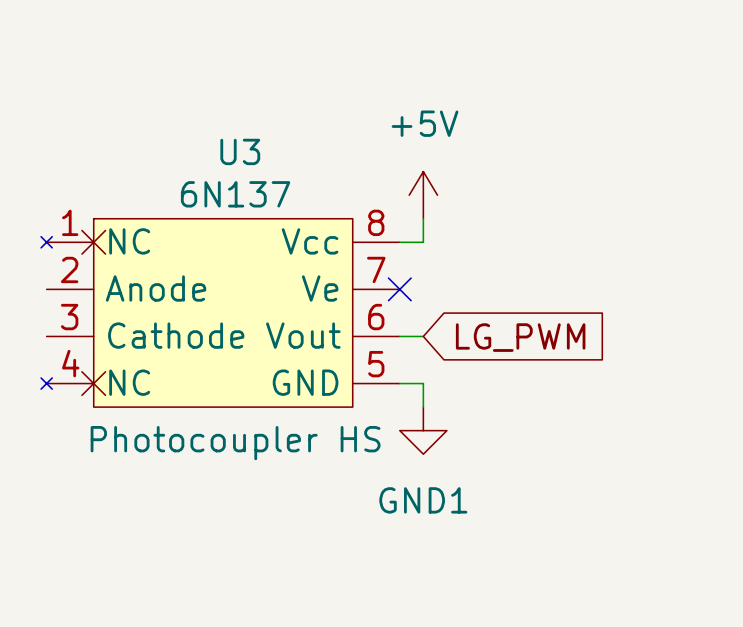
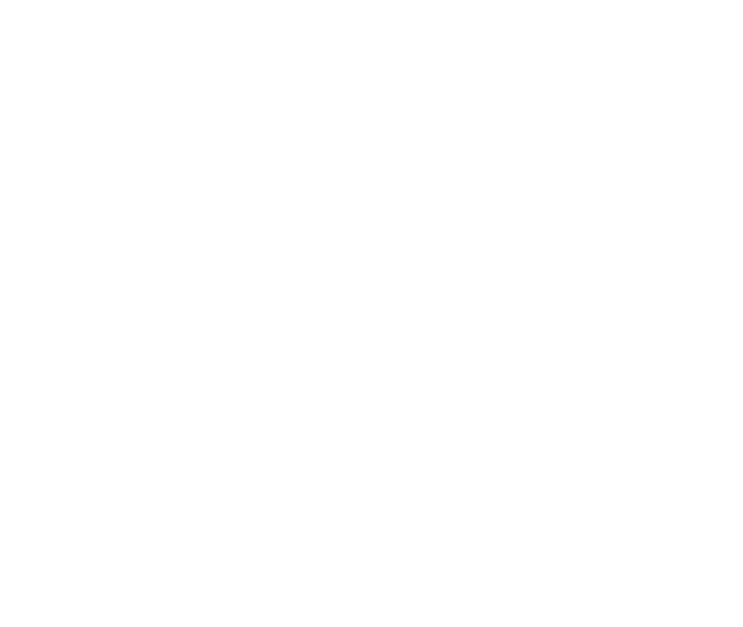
power symbol: +5V (423, 195) -> none
wire: (423, 218) (423, 242) (399, 242) -> none
no-connect mark: (399, 289) -> none
U3: 6N137 (220, 312) -> none
wire: (399, 336) (423, 336) -> none
global label: LG_PWM (520, 337) -> none
wire: (399, 383) (423, 383) (423, 407) -> none
power symbol: GND1 (423, 430) -> none

